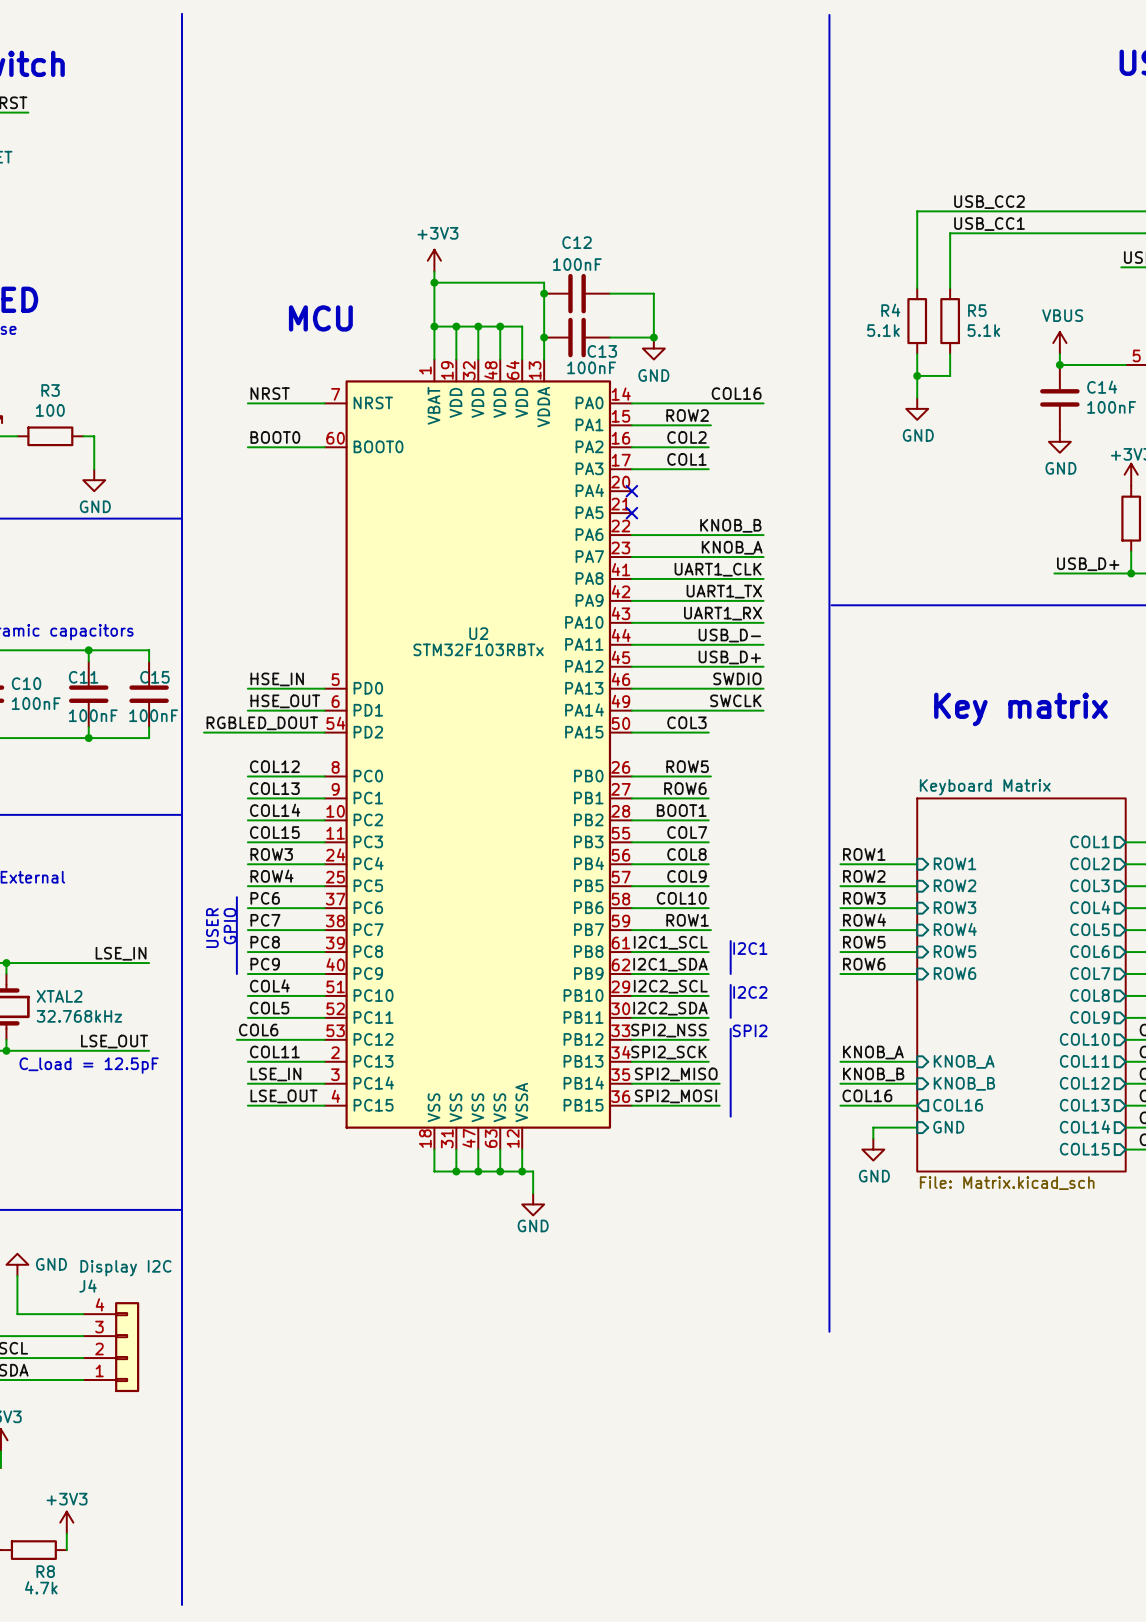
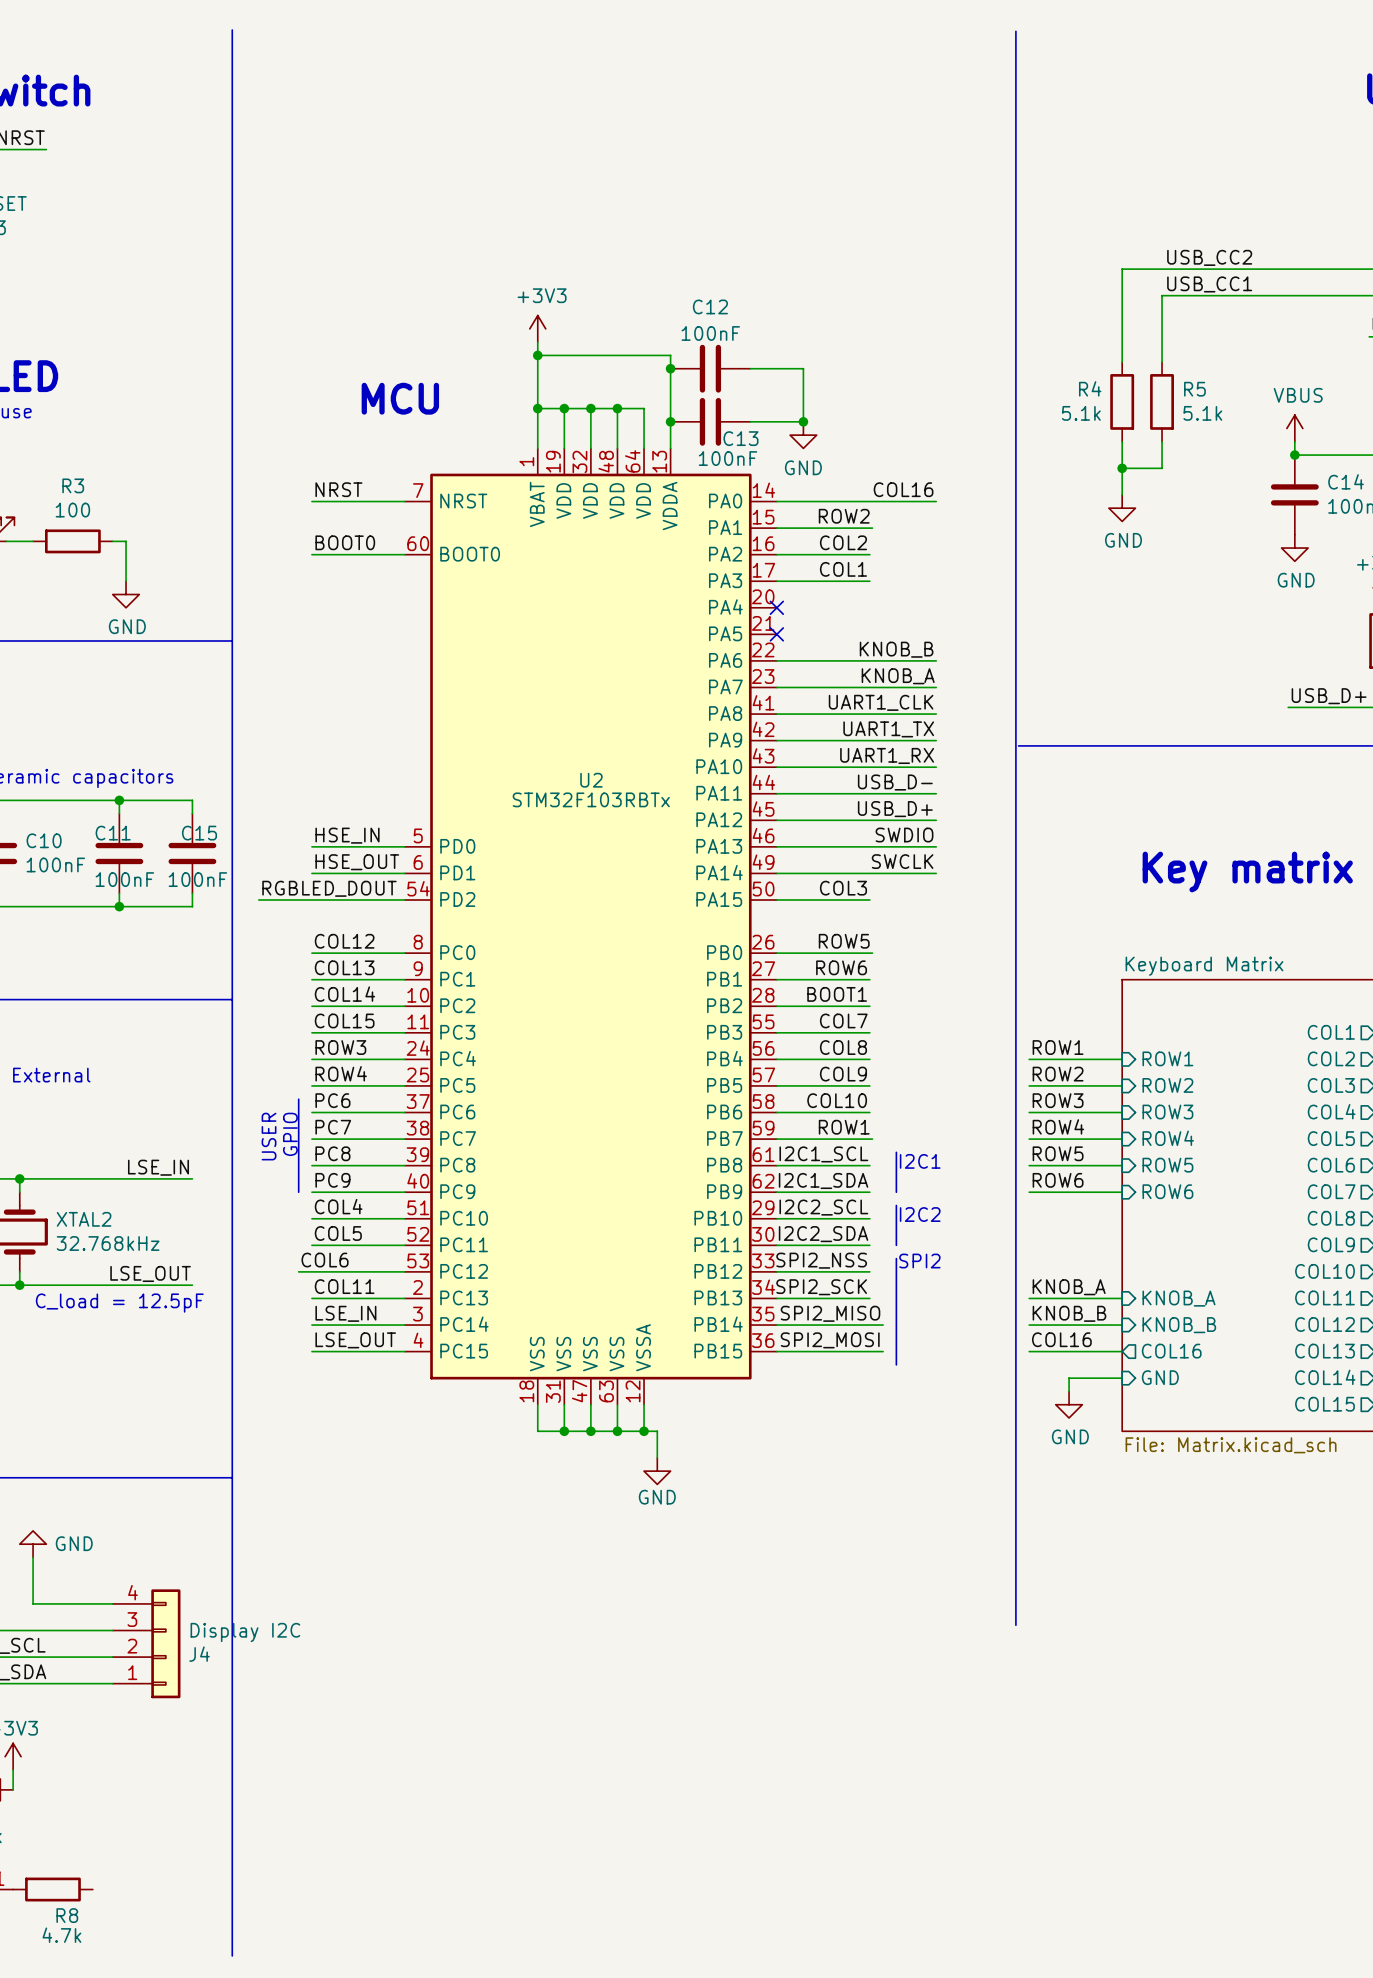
J4 value position: Display I2C (125, 1268) -> Display I2C (245, 1632)
J4 name position: J4 (88, 1286) -> J4 (199, 1654)
power symbol: +3V3 (66, 1522) -> none
wire: (66, 1533) (66, 1550) -> none

